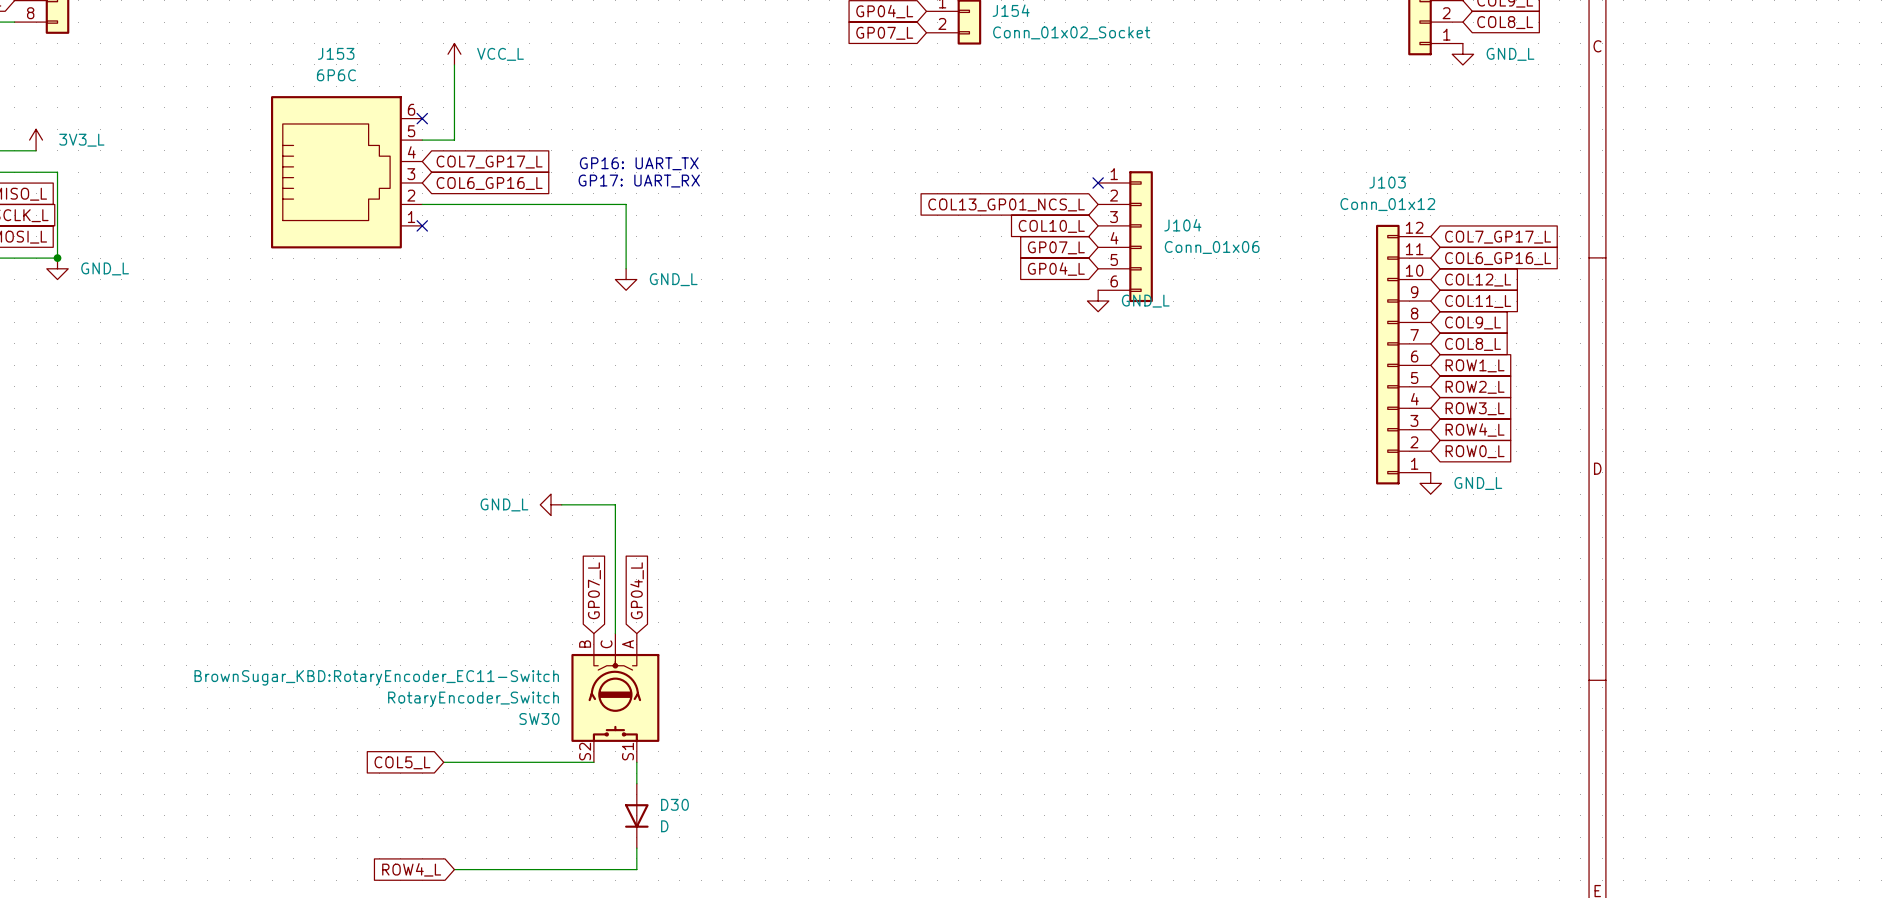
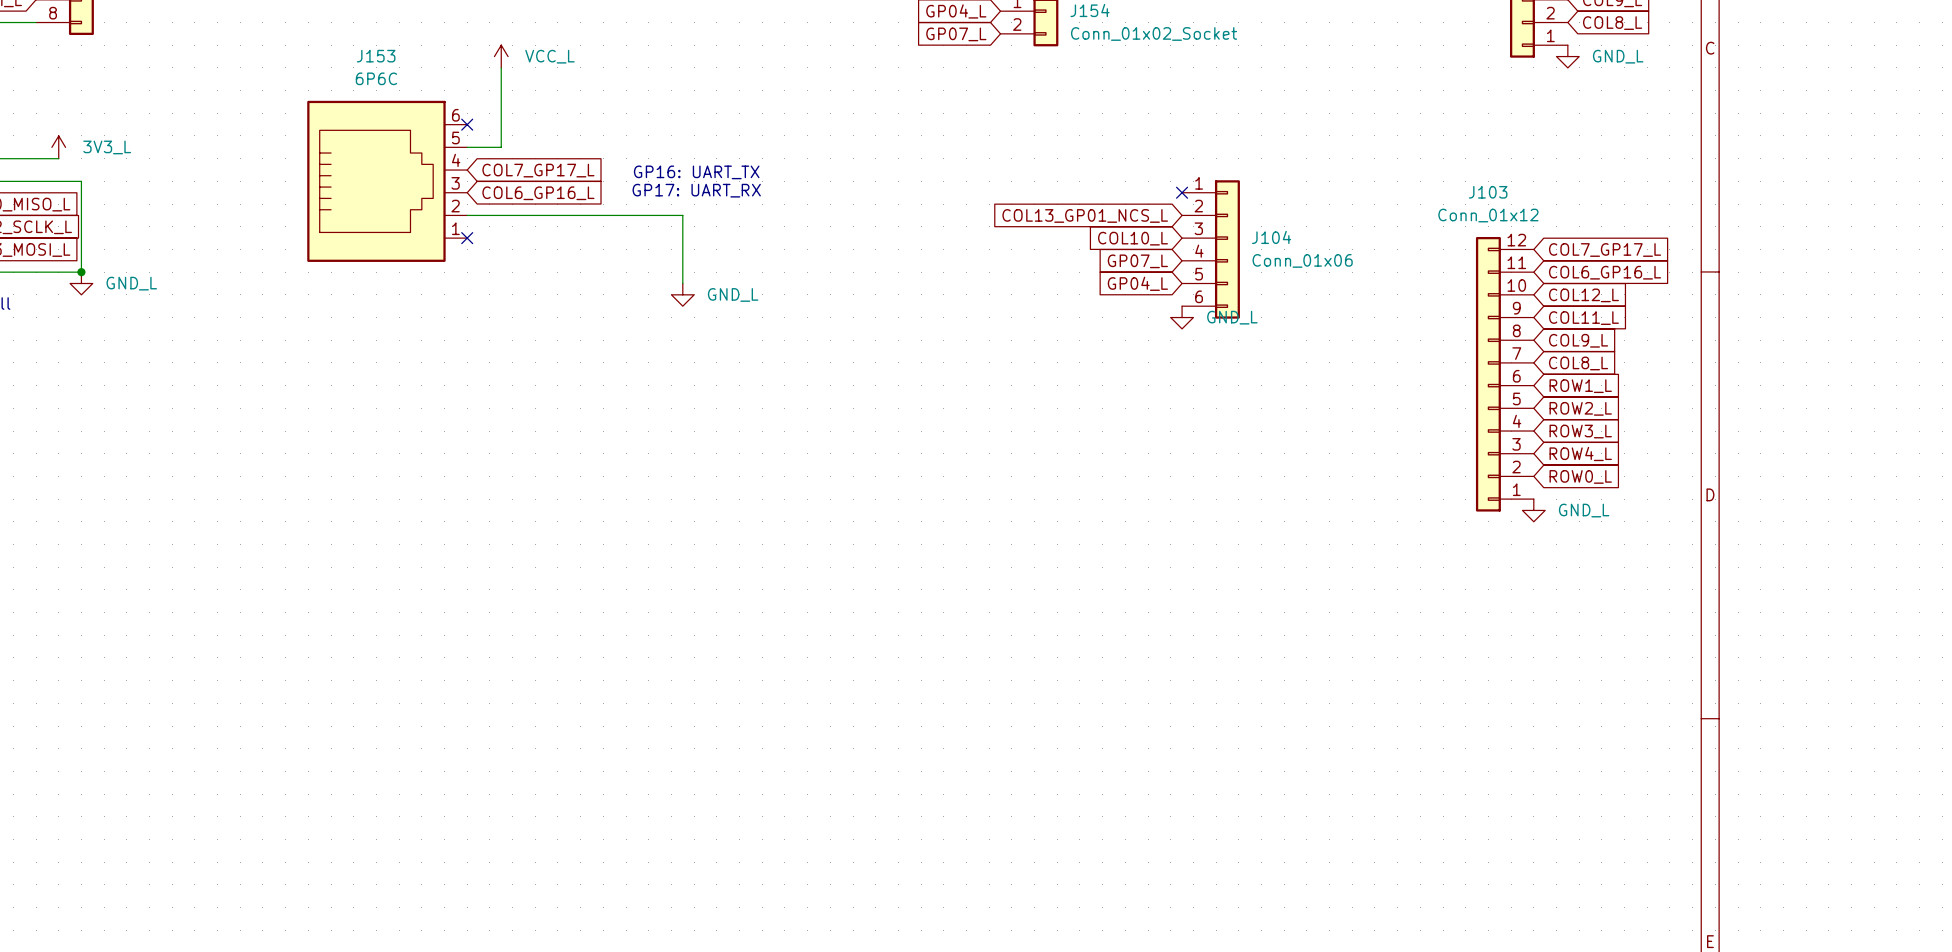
power symbol: GND_L (551, 504) -> none
wire: (561, 504) (615, 504) (615, 633) -> none
global label: GP07_L (594, 590) -> none
global label: GP04_L (637, 590) -> none
SW30: RotaryEncoder_Switch (615, 697) -> none
global label: COL5_L (402, 762) -> none
wire: (443, 762) (593, 762) -> none
wire: (636, 762) (636, 783) -> none
D30: D (636, 815) -> none
wire: (636, 848) (636, 869) (454, 869) -> none
global label: ROW4_L (411, 869) -> none

